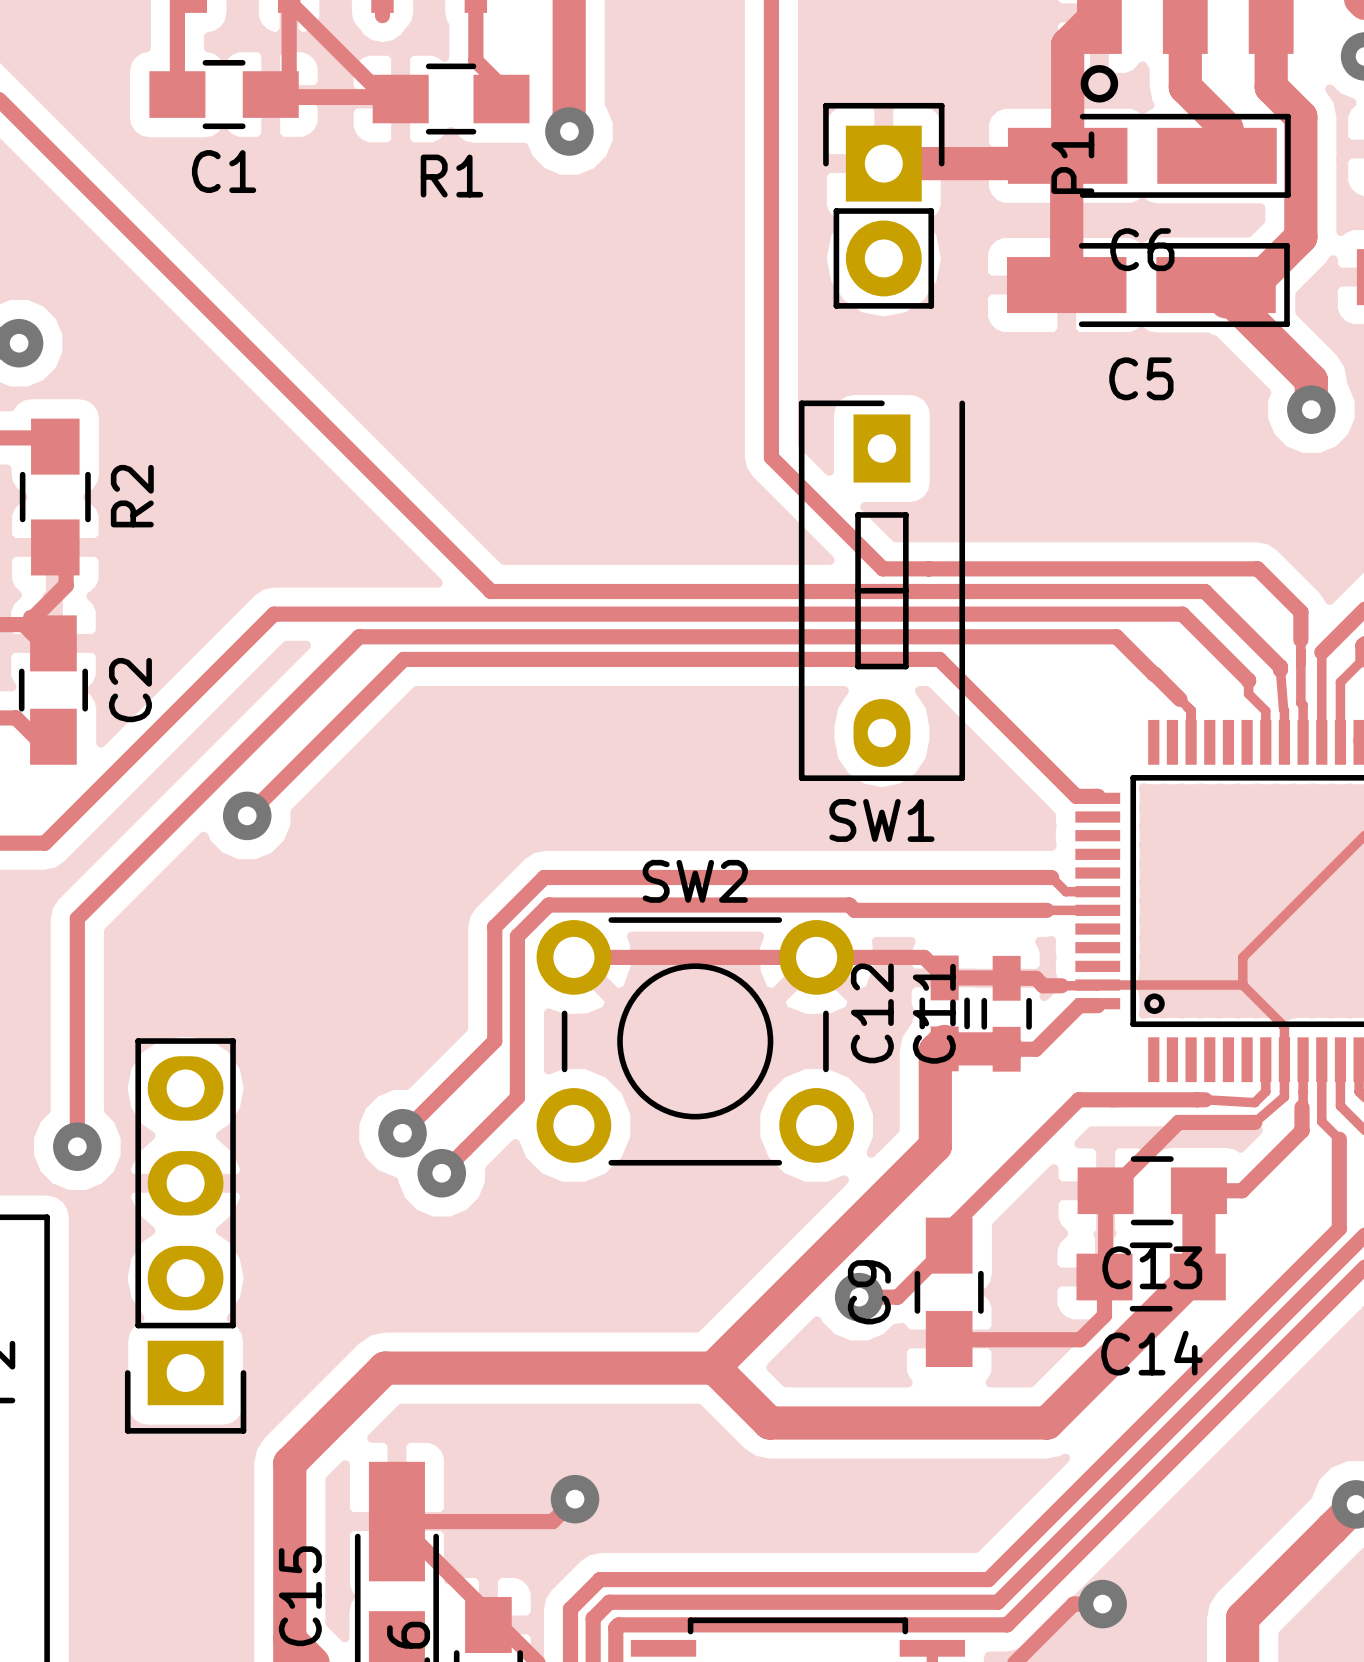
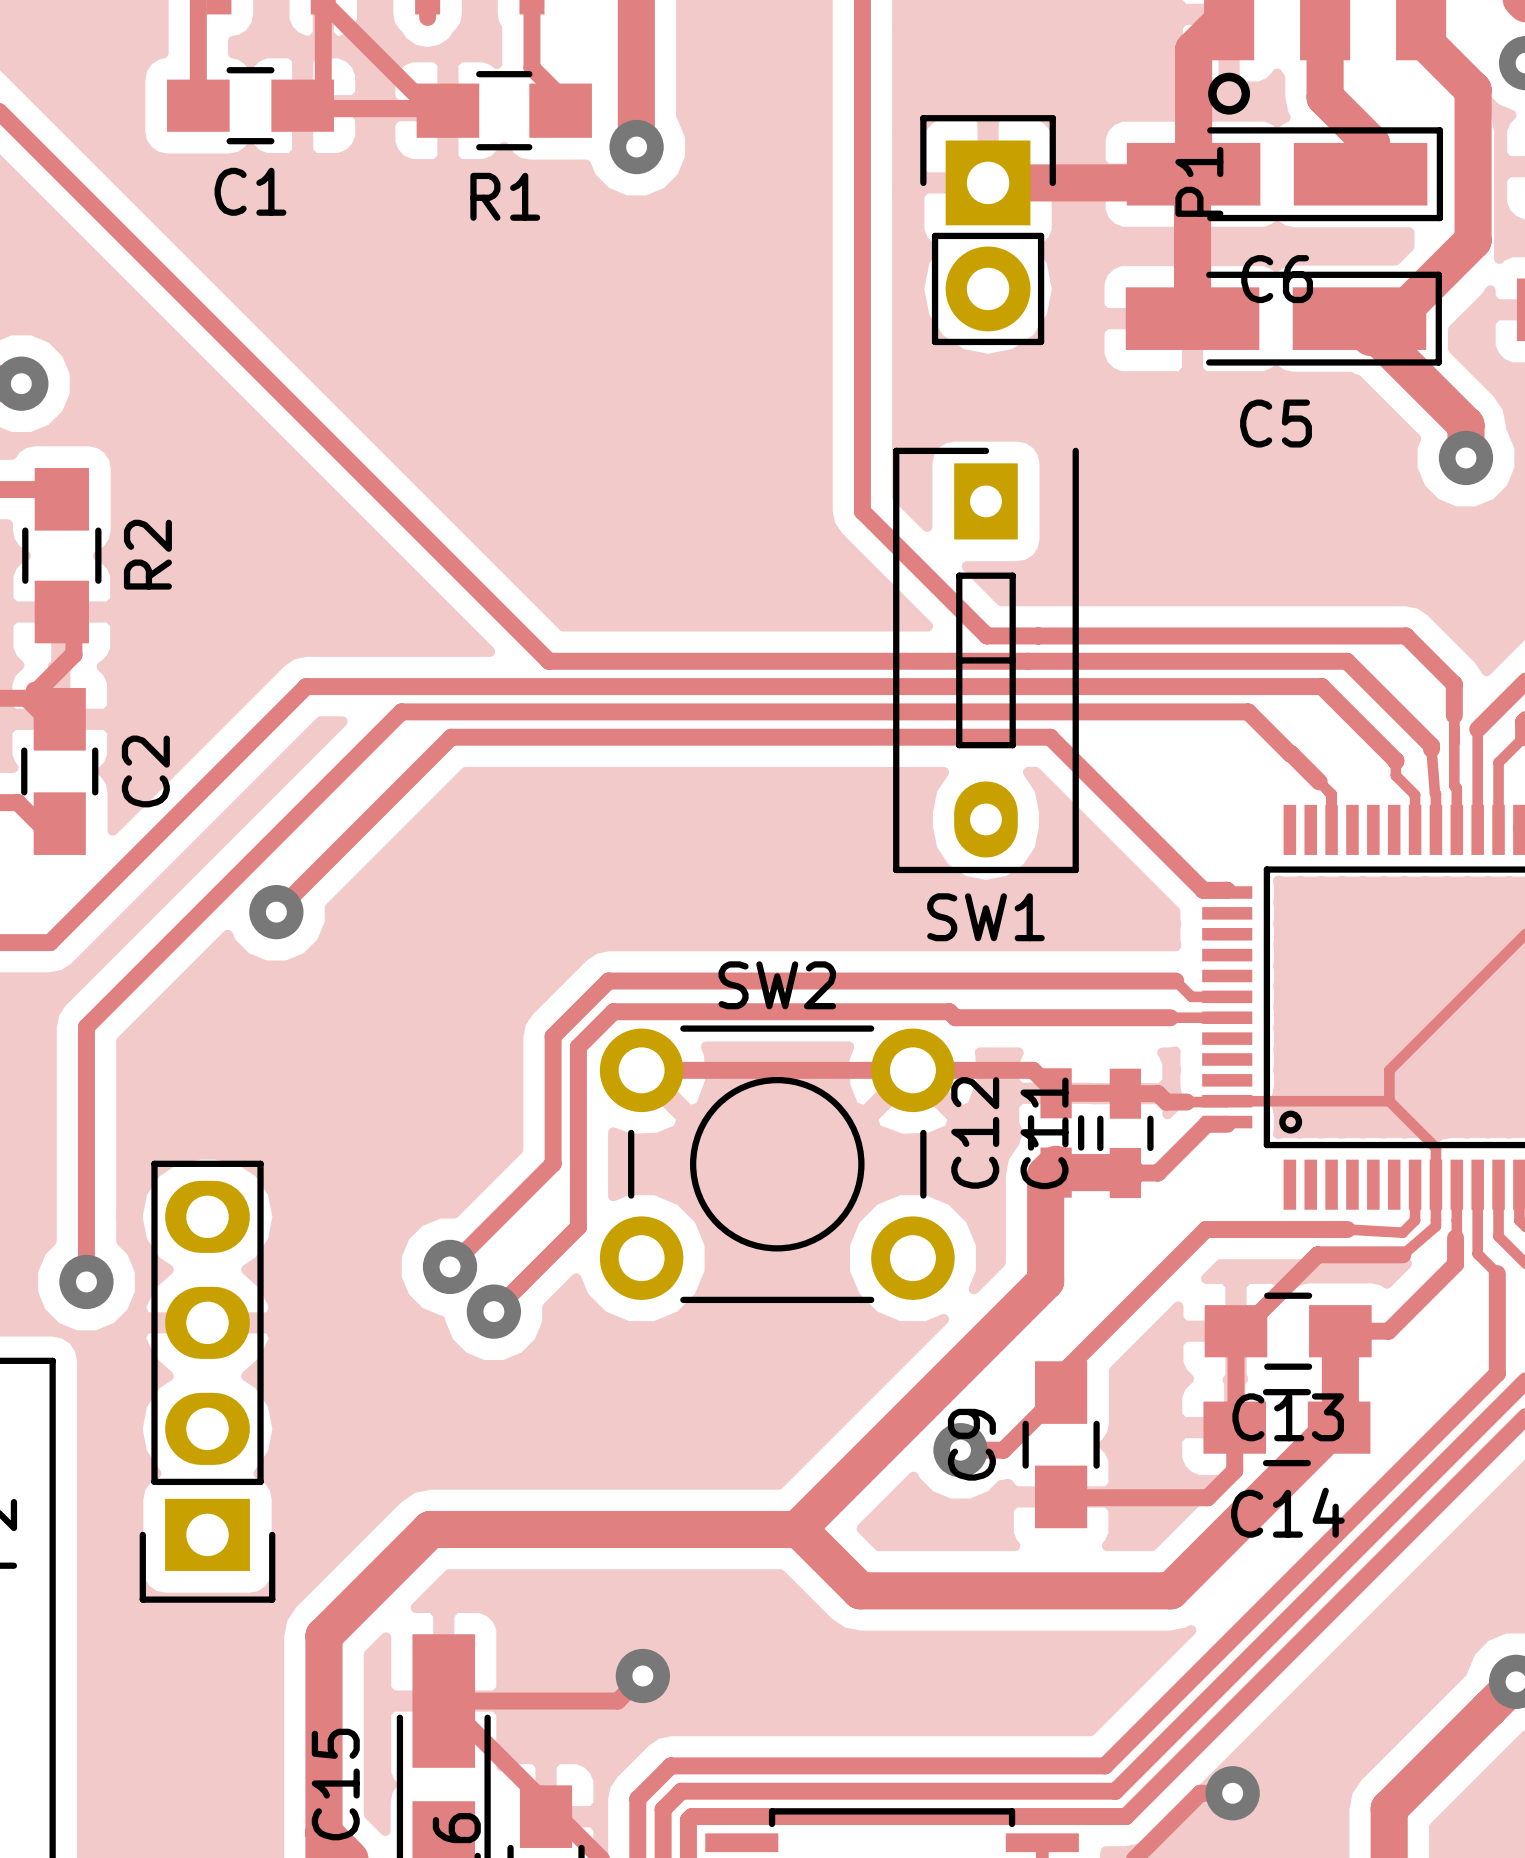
track: (1271, 34) (1271, 87) (1300, 116) (1300, 237) (1252, 285) -> (1421, 38) (1473, 90) (1473, 240) (1394, 318)

